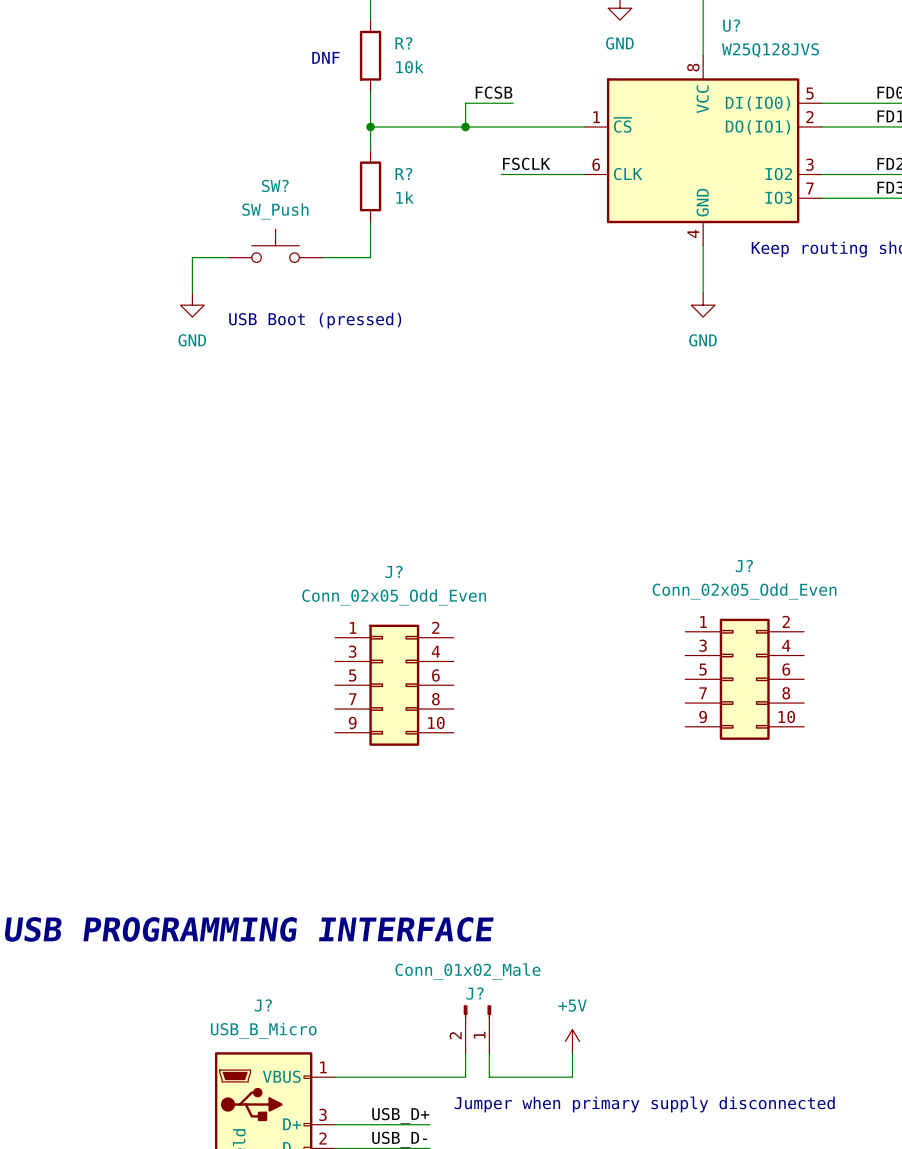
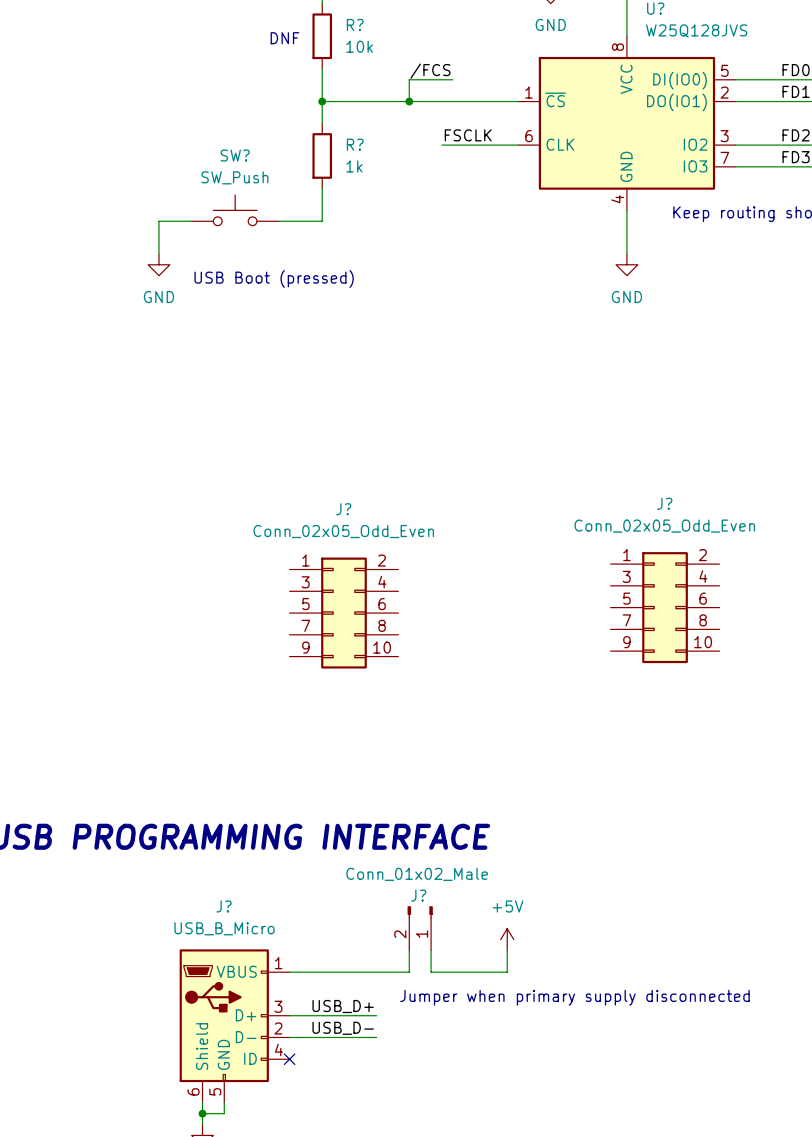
label: FCSB (494, 92) -> /FCS (430, 71)

